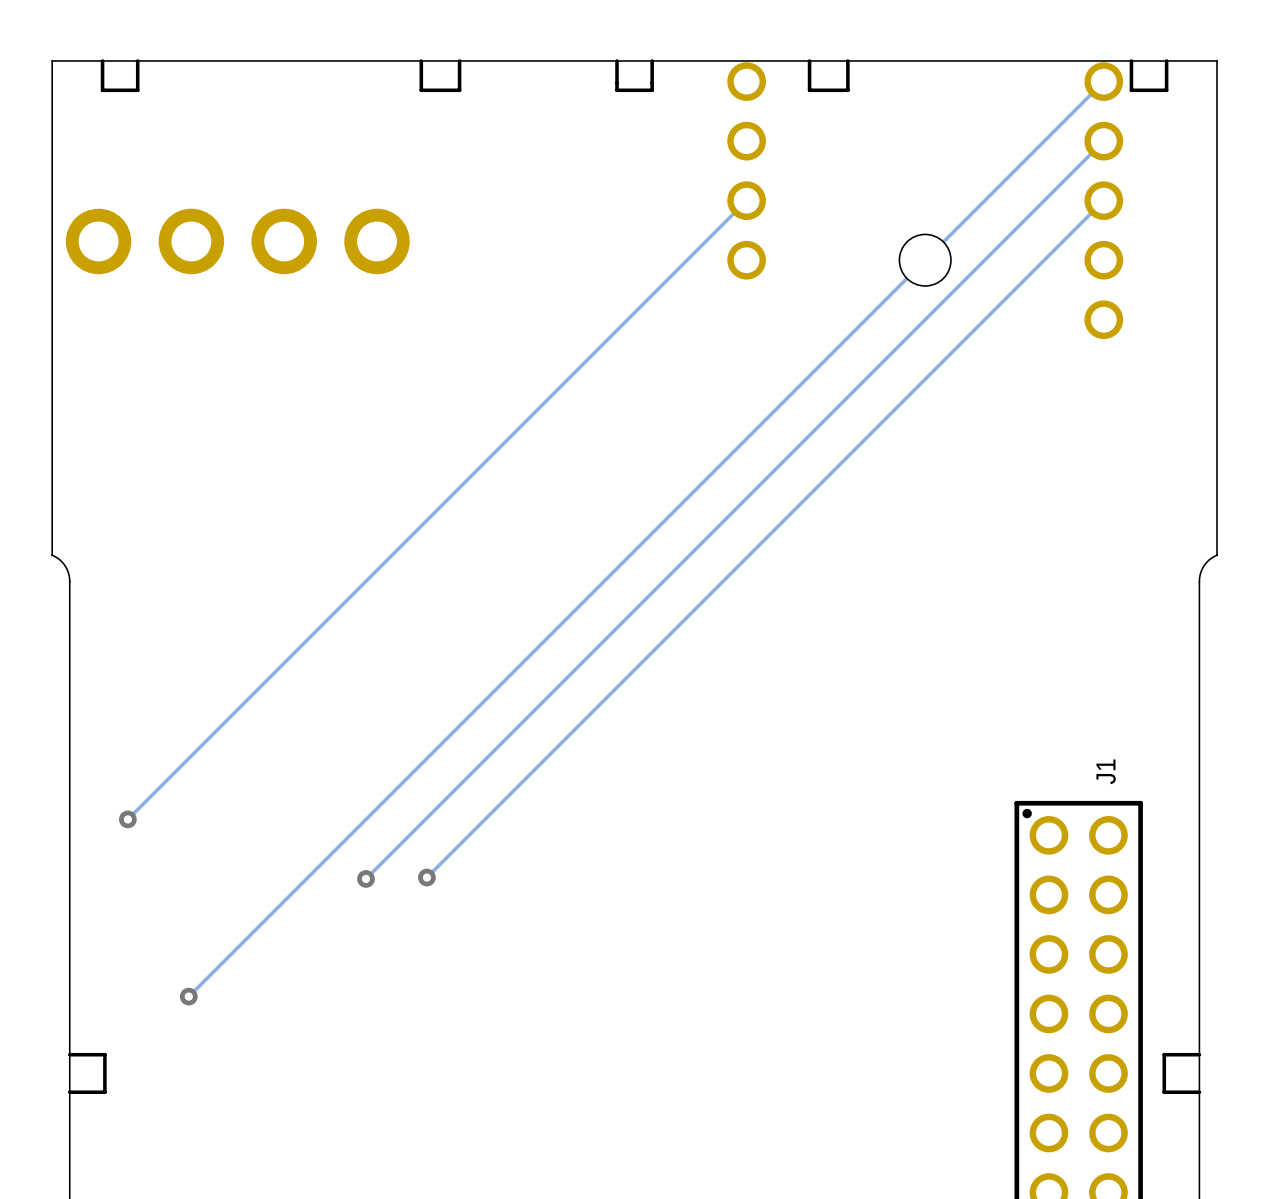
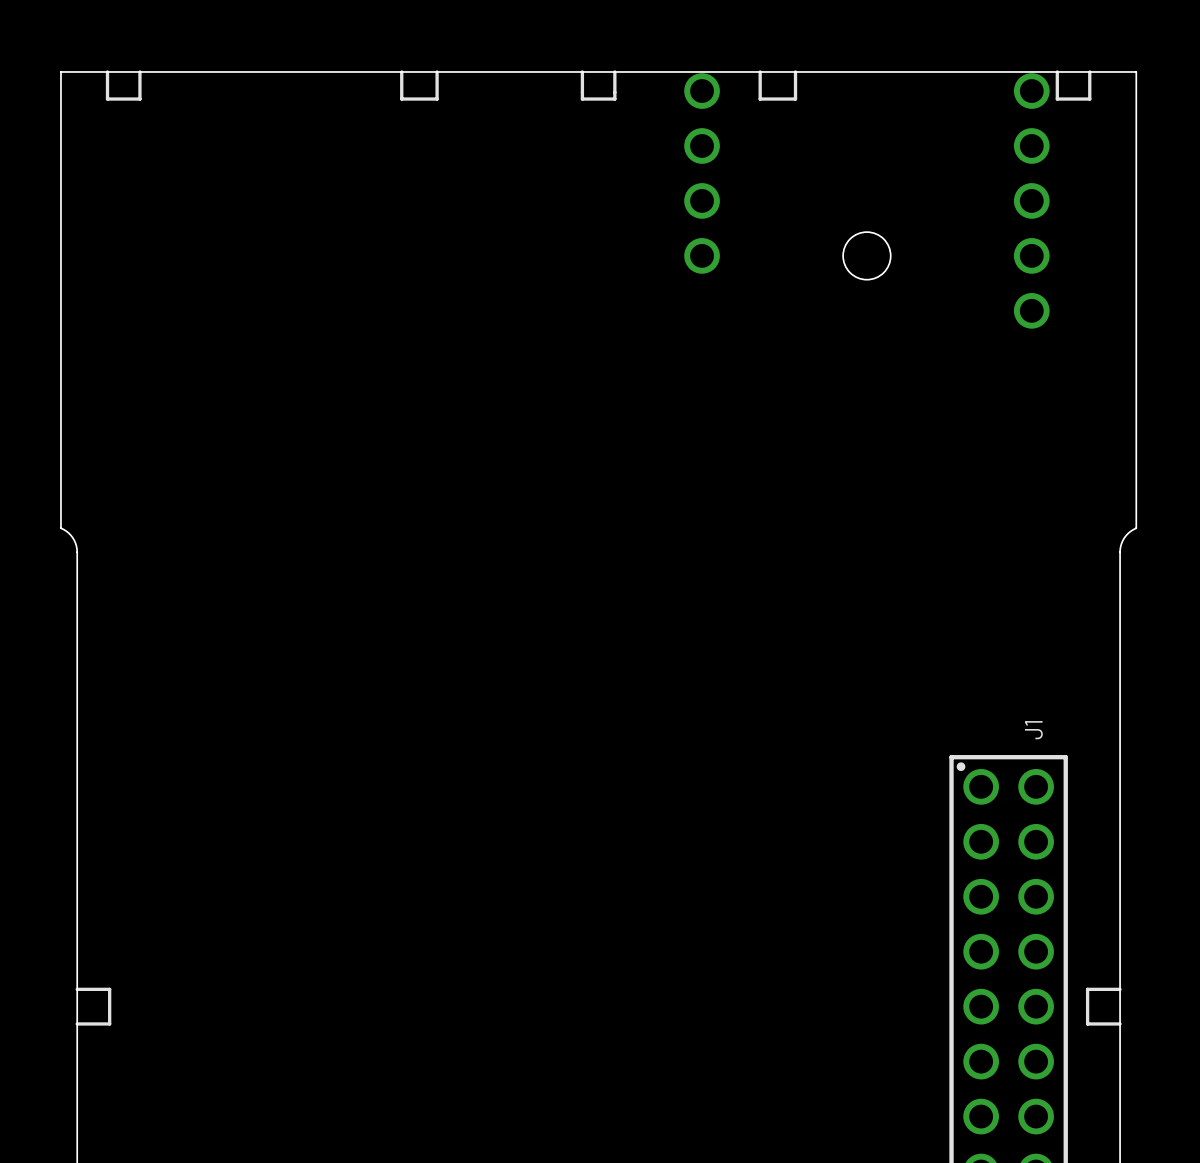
track: (1103, 81) (188, 996) -> none
track: (1103, 141) (365, 878) -> none
track: (746, 200) (127, 819) -> none
track: (1103, 200) (426, 877) -> none
part: (237, 241) -> none
via: (127, 819) -> none
via: (426, 877) -> none
via: (365, 878) -> none
via: (188, 996) -> none

